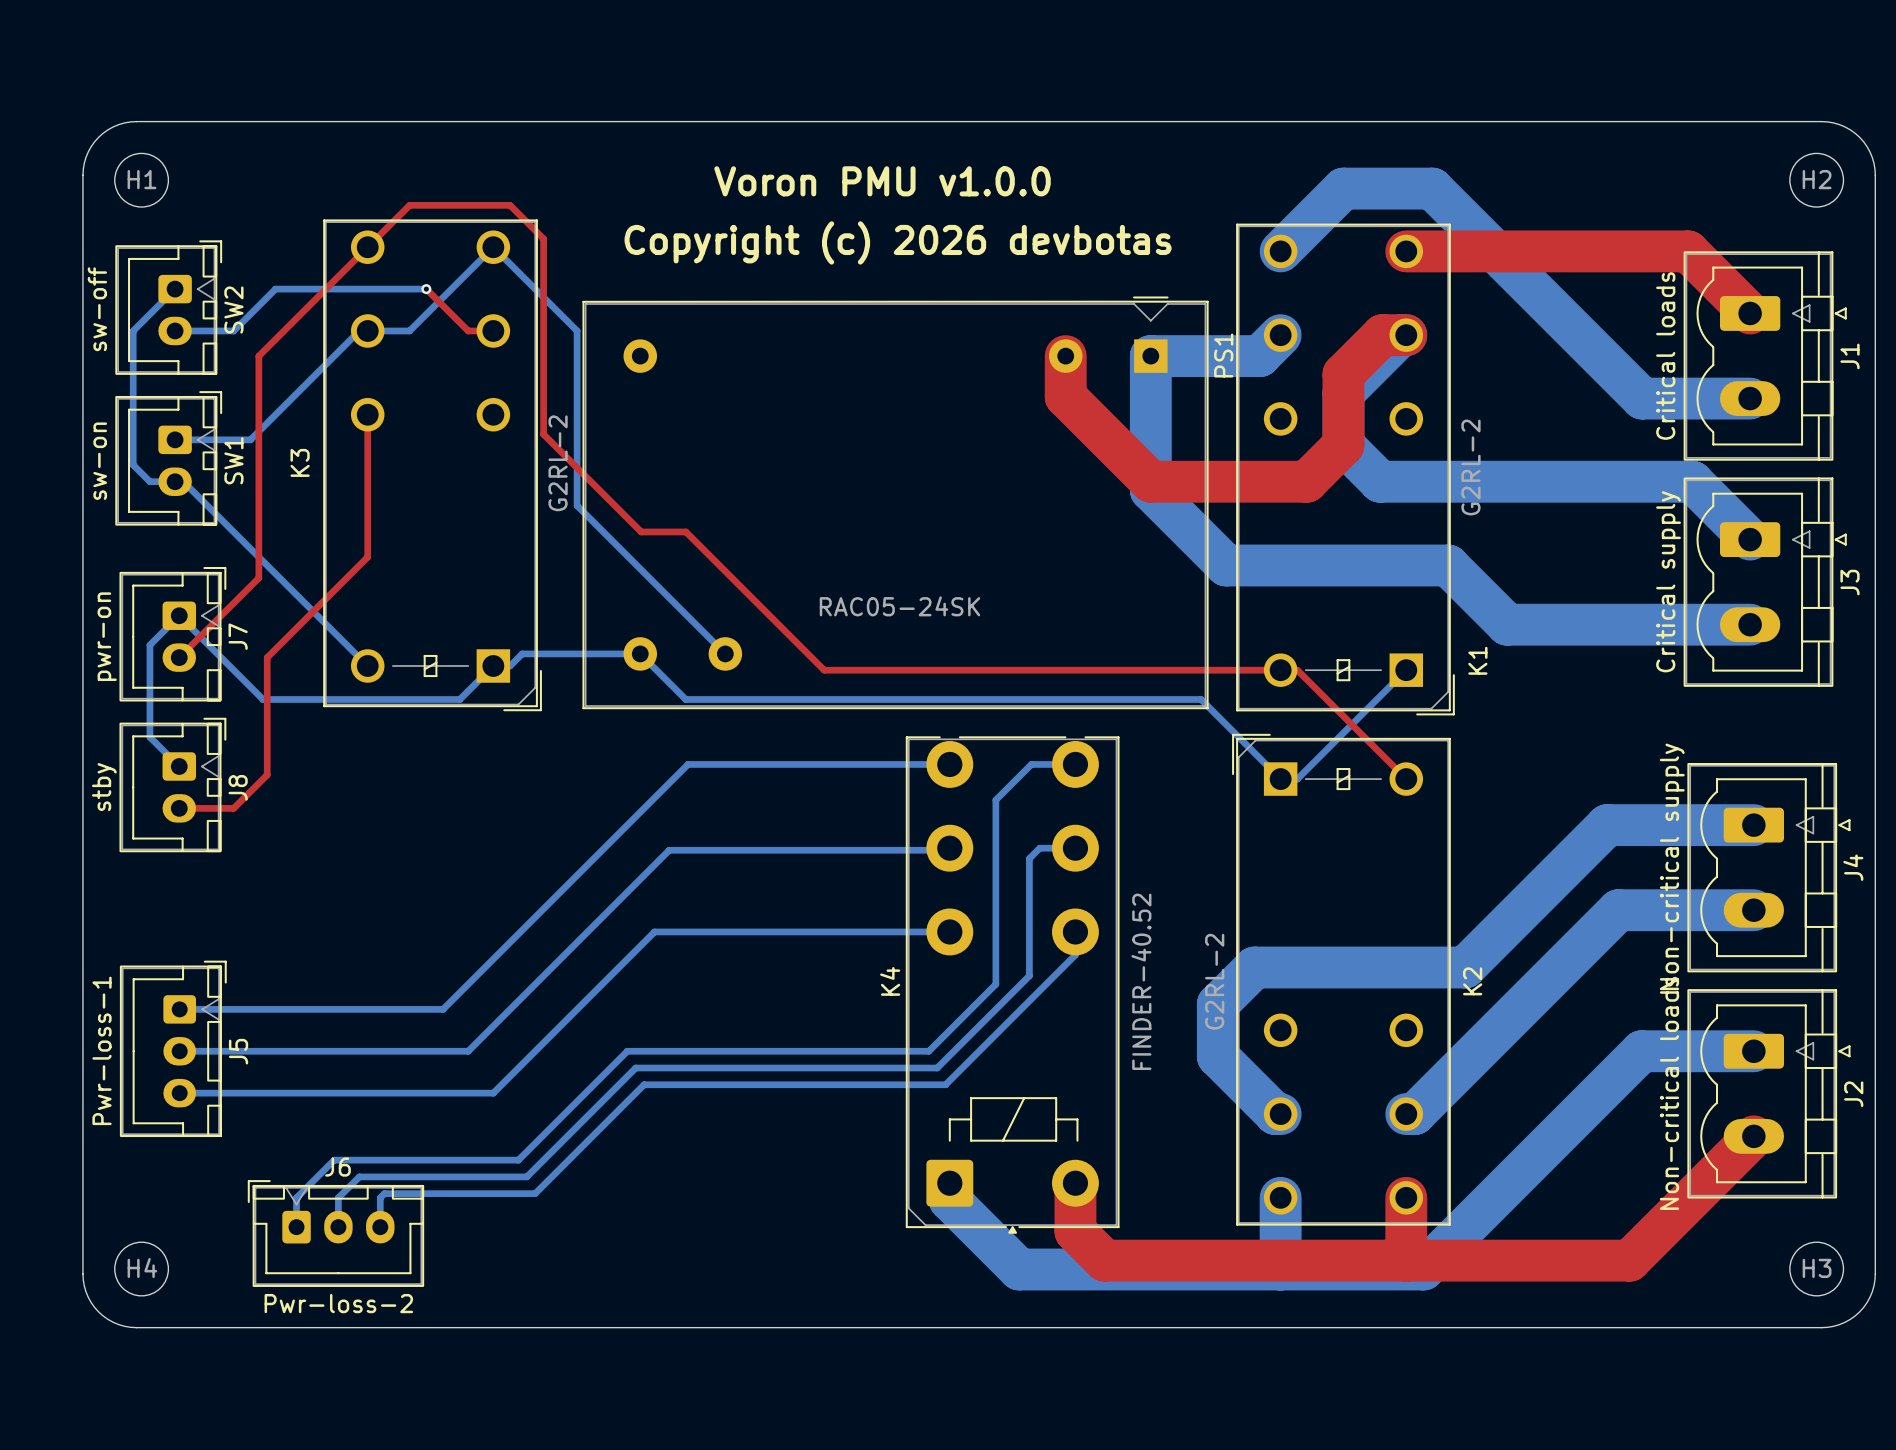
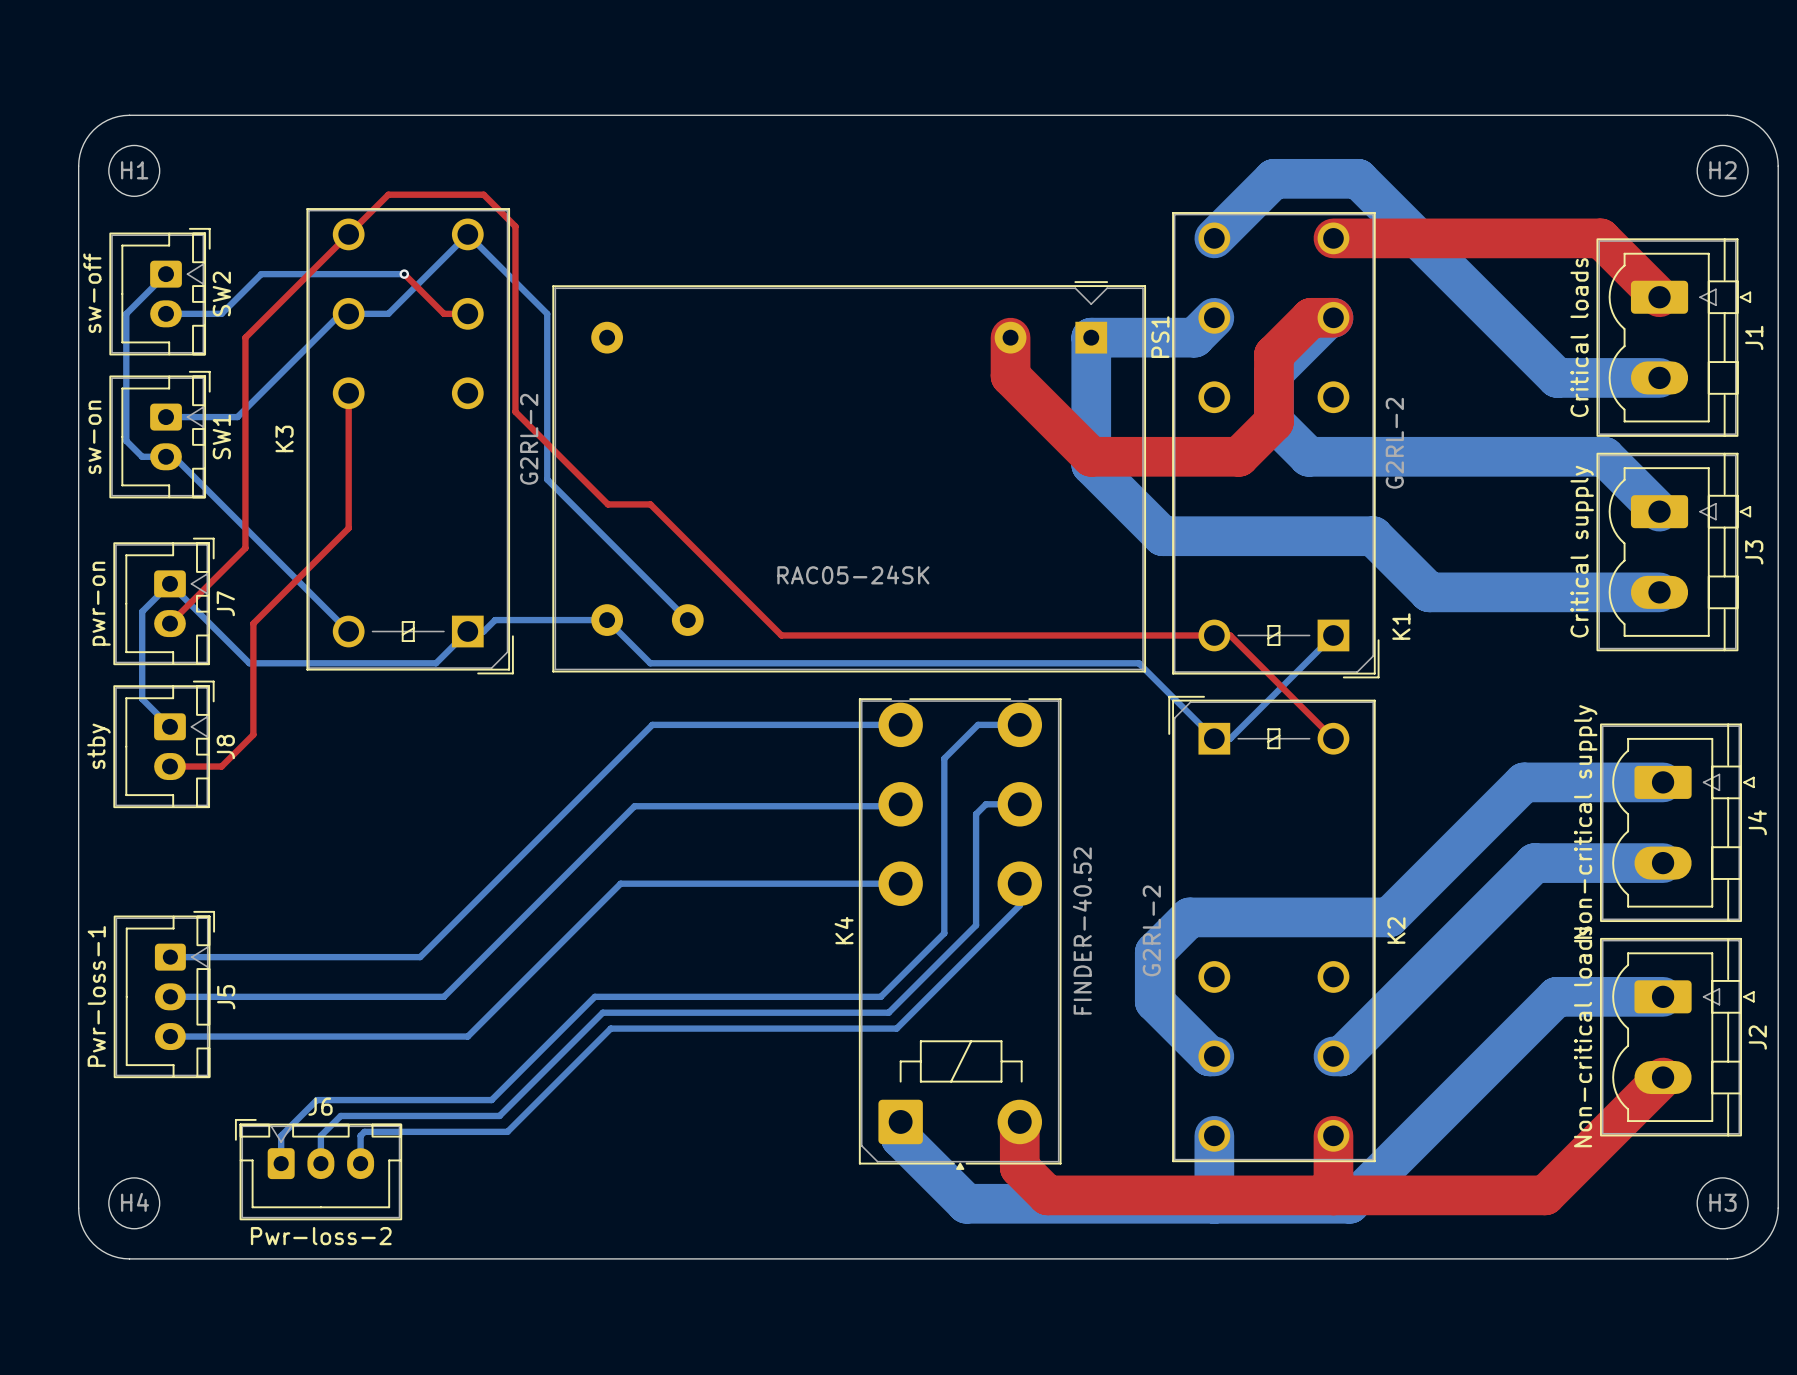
text: Voron PMU v1.0.0 (882, 181) -> none
text: Copyright (c) 2026 devbotas (898, 242) -> none

